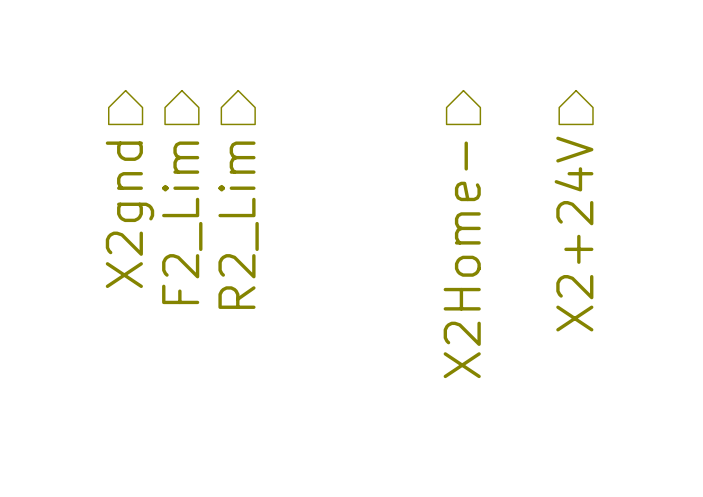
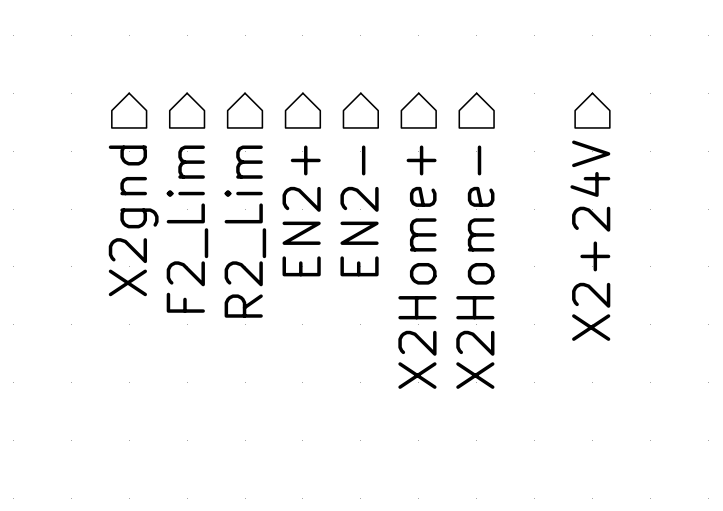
hierarchical label: none -> EN2+ (301, 210)
hierarchical label: none -> EN2- (359, 210)
hierarchical label: none -> X2Home+ (417, 267)

